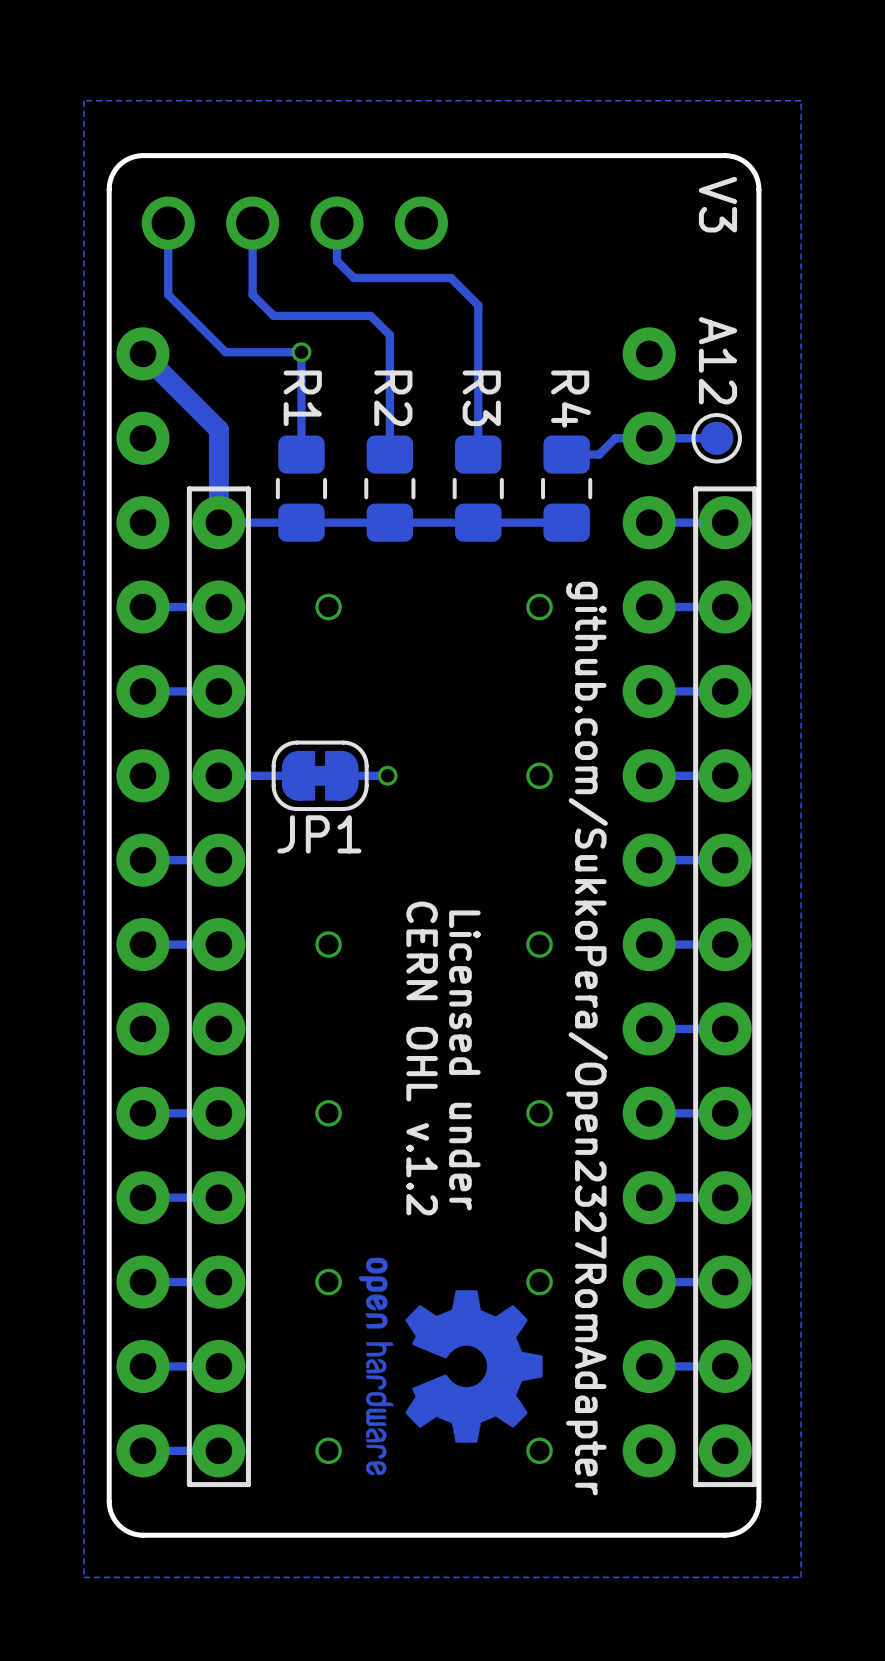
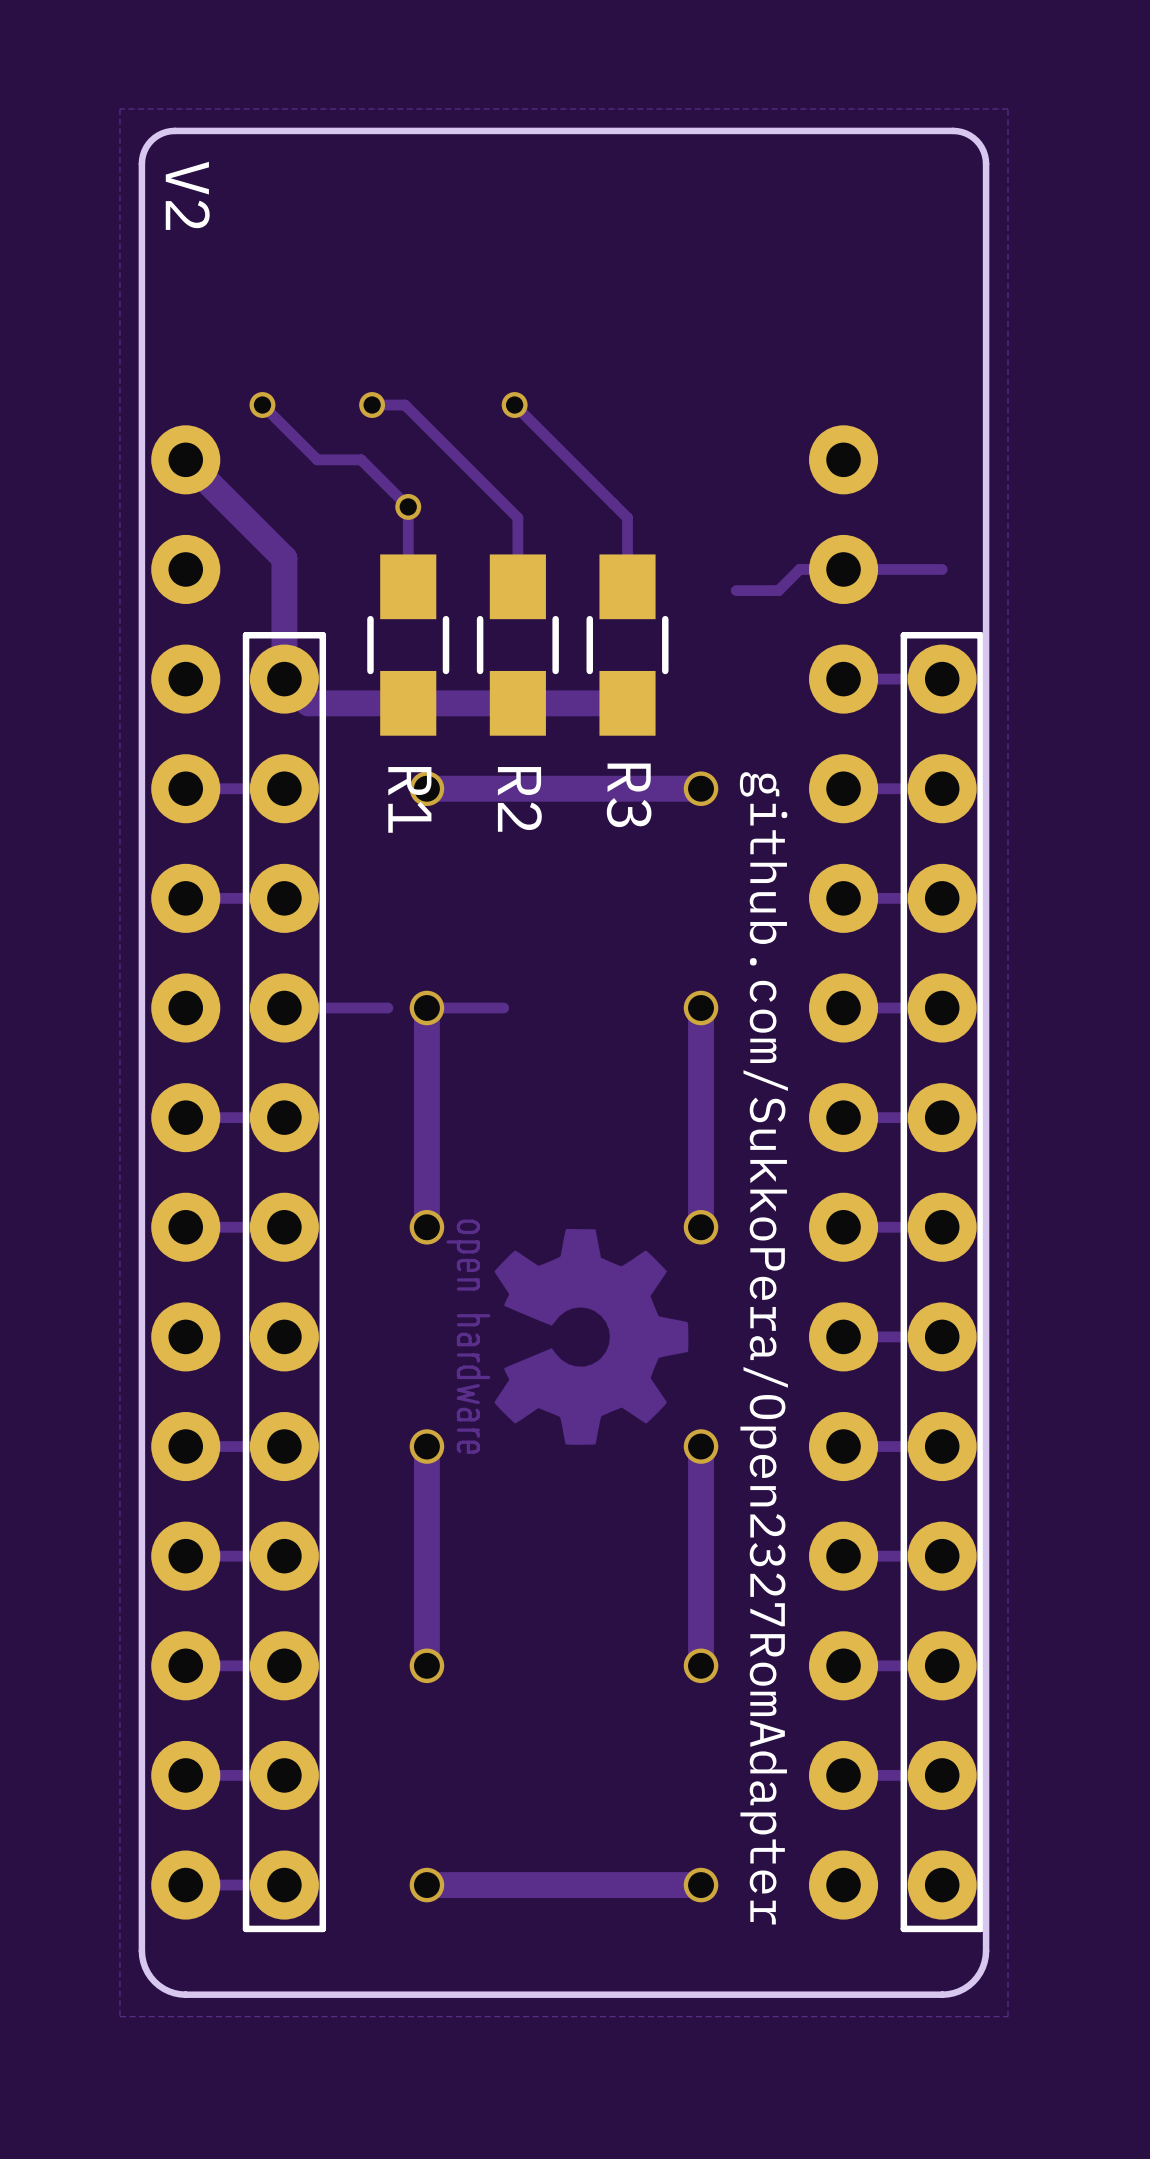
zone outline: (801, 100) (83, 100) (83, 1577) (801, 1577) (801, 100) -> (1008, 109) (1008, 2016) (119, 2016) (119, 109) (1008, 109)
text: none -> V2 (187, 195)
board edge: (758, 189) (756, 176) (749, 165) (738, 158) (725, 155) (142, 155) (130, 158) (119, 165) (111, 176) (109, 189) -> (986, 246) (984, 155) (979, 143) (973, 137) (965, 133) (953, 130) (170, 131) (162, 133) (151, 140) (143, 155) (141, 246)
text: V3 (717, 204) -> none
track: (168, 223) (168, 294) (225, 352) (301, 352) (301, 454) -> none
track: (252, 223) (252, 294) (273, 315) (370, 315) (389, 335) (389, 454) -> none
part: (294, 223) -> none
track: (337, 223) (337, 261) (353, 277) (450, 277) (478, 305) (478, 454) -> none
track: none -> (262, 405) (317, 459) (361, 459) (408, 506) (408, 586)
via: none -> (262, 405)
track: none -> (372, 405) (405, 405) (517, 517) (517, 586)
via: none -> (372, 405)
track: none -> (514, 405) (627, 517) (627, 586)
via: none -> (514, 405)
via: (301, 352) -> none
text: A12 (717, 360) -> none
via: none -> (408, 506)
R1 name position: R1 (302, 398) -> R1 (409, 799)
R2 name position: R2 (393, 398) -> R2 (519, 799)
R3 name position: R3 (481, 398) -> R3 (629, 795)
R1 footprint: [275, 435, 328, 542] -> [367, 554, 450, 736]
R2 footprint: [364, 435, 416, 542] -> [476, 554, 559, 736]
R3 footprint: [452, 435, 504, 542] -> [586, 554, 669, 736]
part: (716, 438) -> none
R4: (566, 488) -> none
track: (566, 522) (218, 522) -> (627, 703) (308, 703) (284, 679)
track: none -> (701, 788) (426, 788)
JP1: (320, 775) -> none
track: none -> (426, 1008) (426, 1227)
via: none -> (426, 1008)
via: (387, 775) -> none
track: none -> (701, 1008) (701, 1227)
drawing: none -> [446, 1219, 689, 1454]
text: CERN OHL v.1.2 (422, 1058) -> none
text: Licensed under (464, 1060) -> none
track: none -> (426, 1446) (426, 1665)
track: none -> (701, 1446) (701, 1665)
drawing: [358, 1257, 543, 1476] -> none
track: none -> (701, 1885) (426, 1885)

